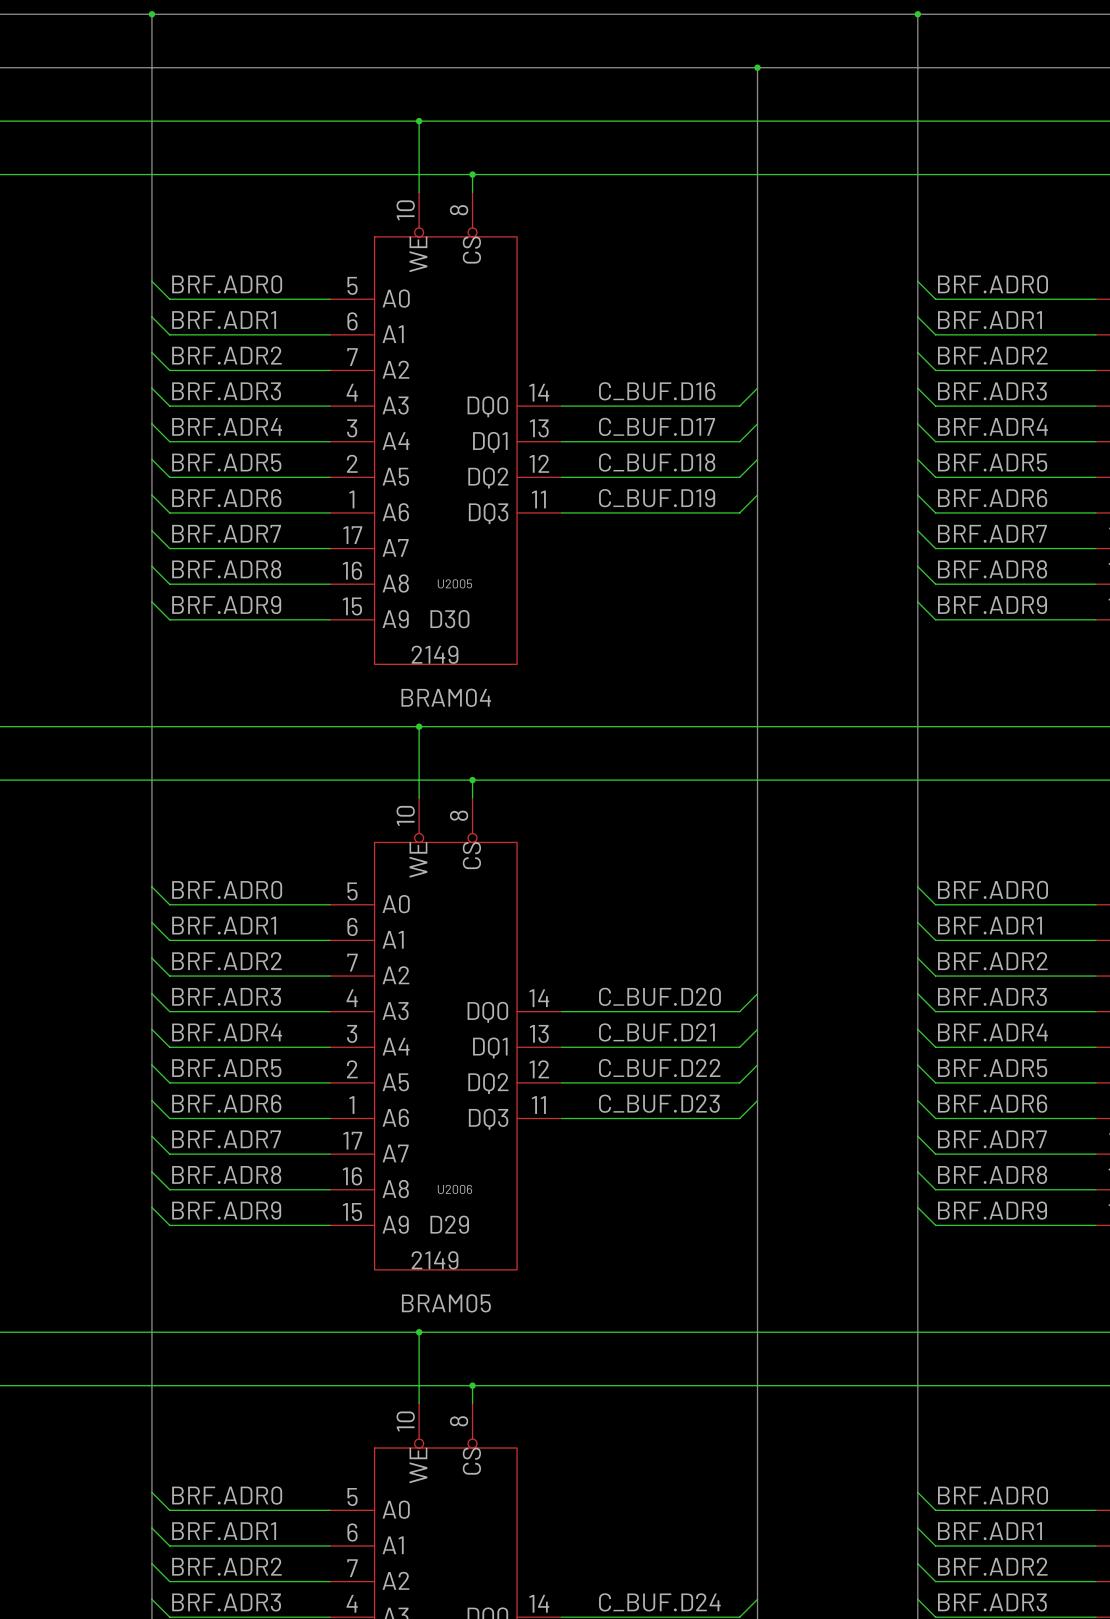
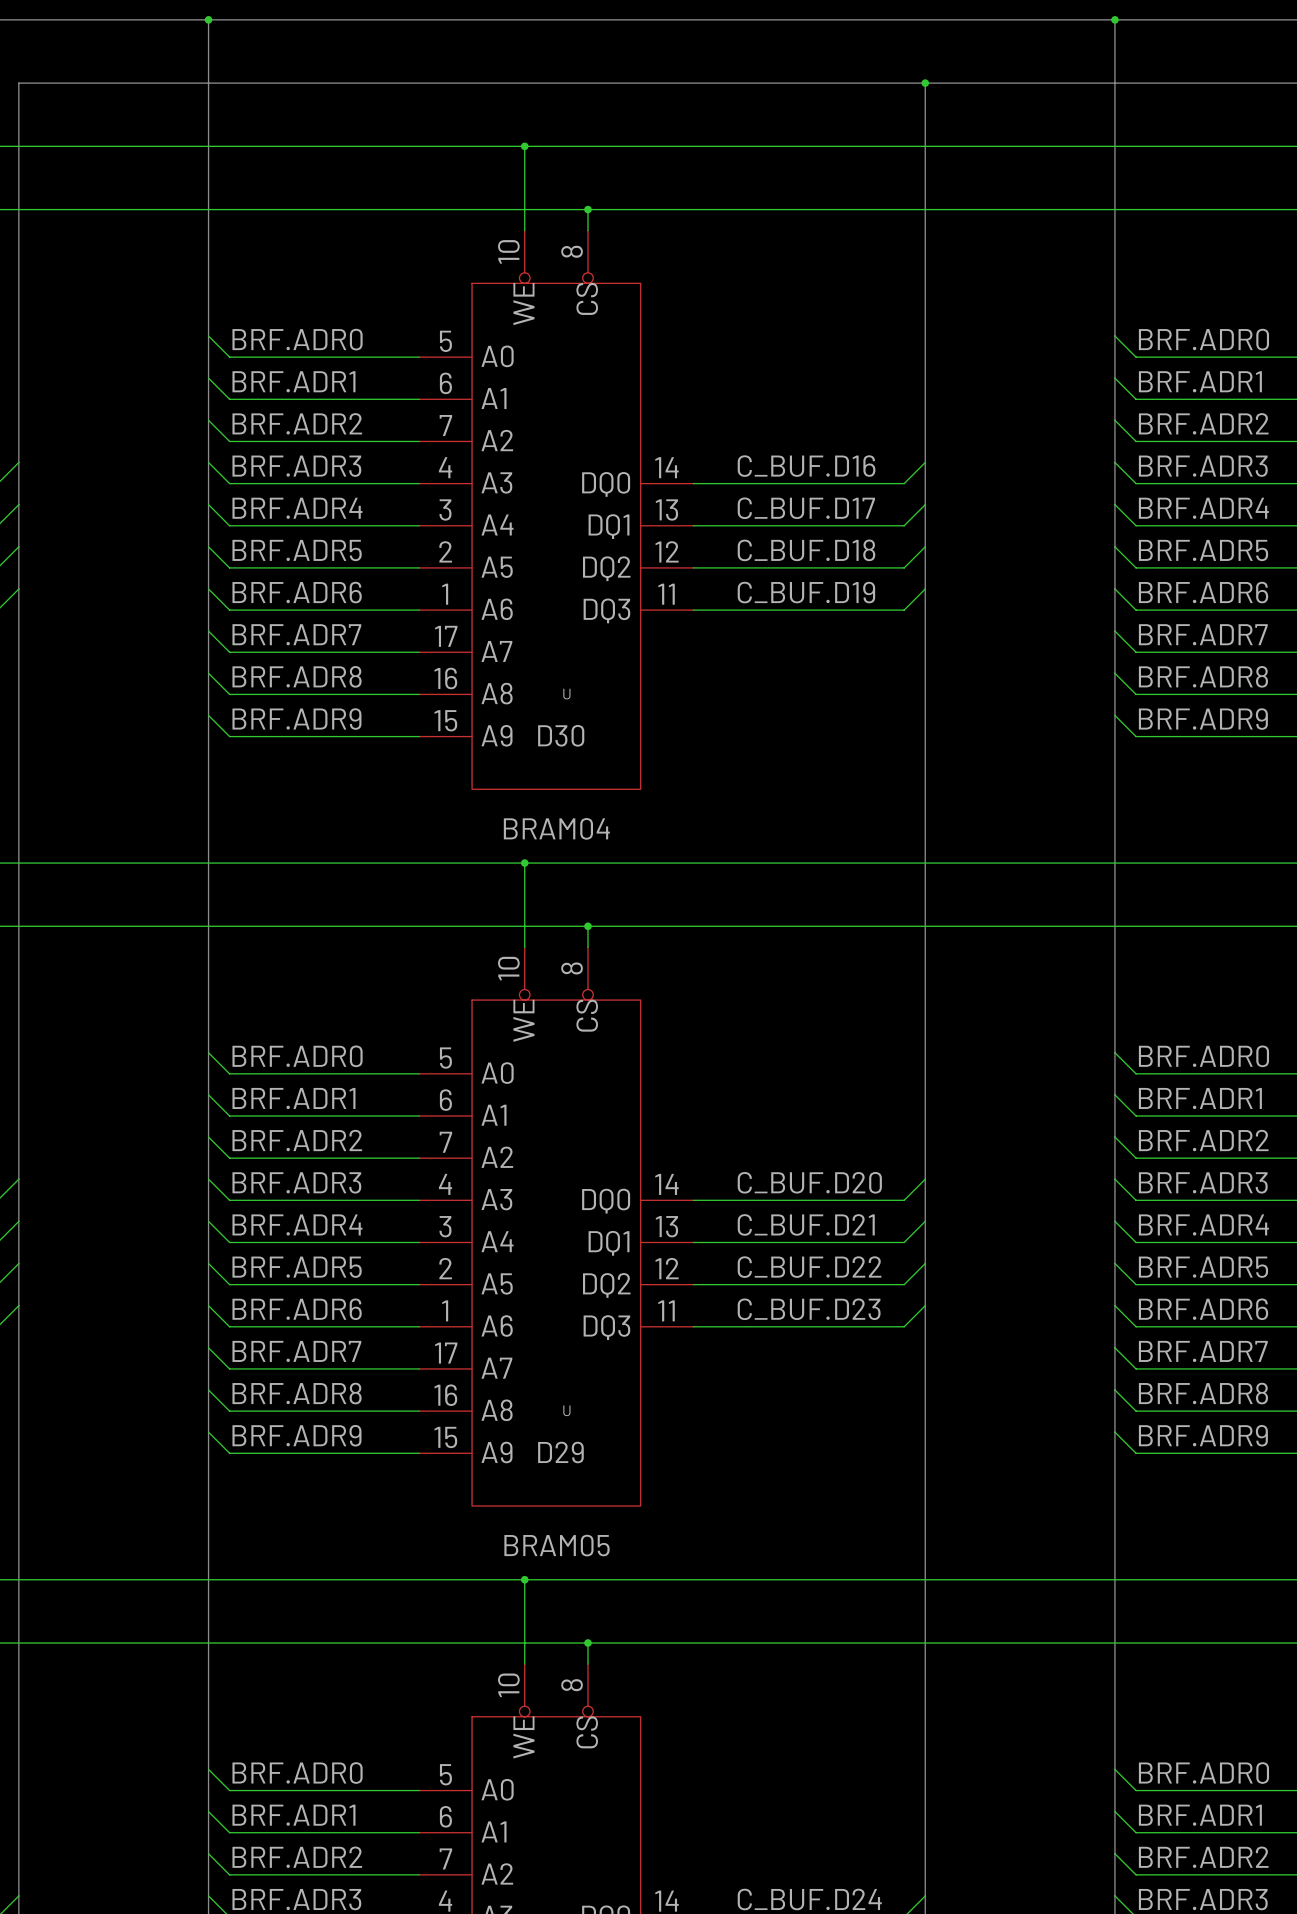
U2005 name: U2005 (454, 583) -> U (566, 694)
U2005 value: 2149 (435, 654) -> none
U2006 name: U2006 (454, 1189) -> U (566, 1410)
U2006 value: 2149 (435, 1260) -> none

